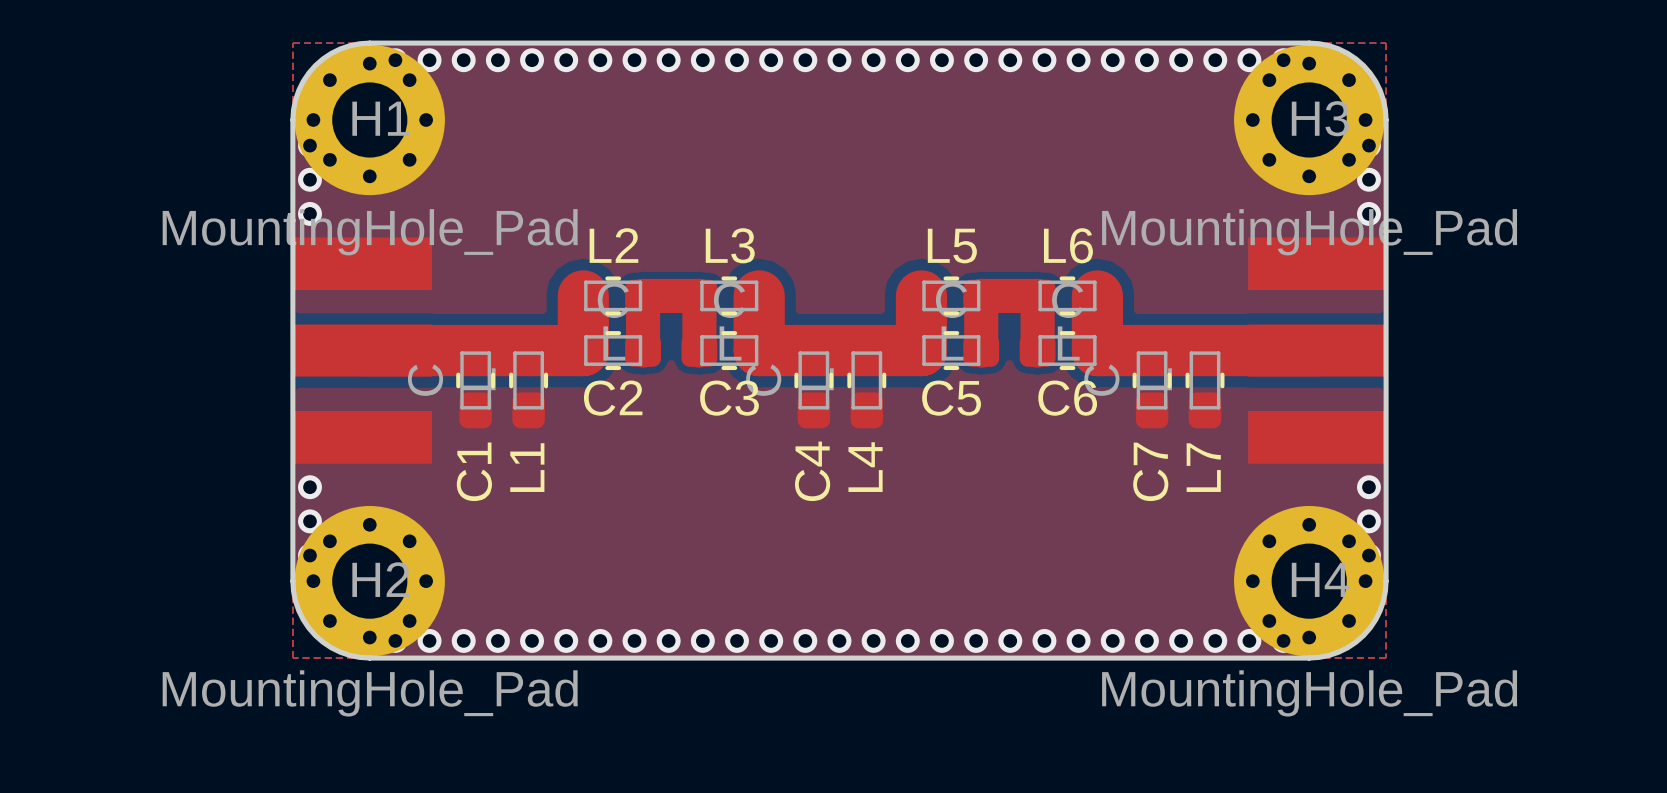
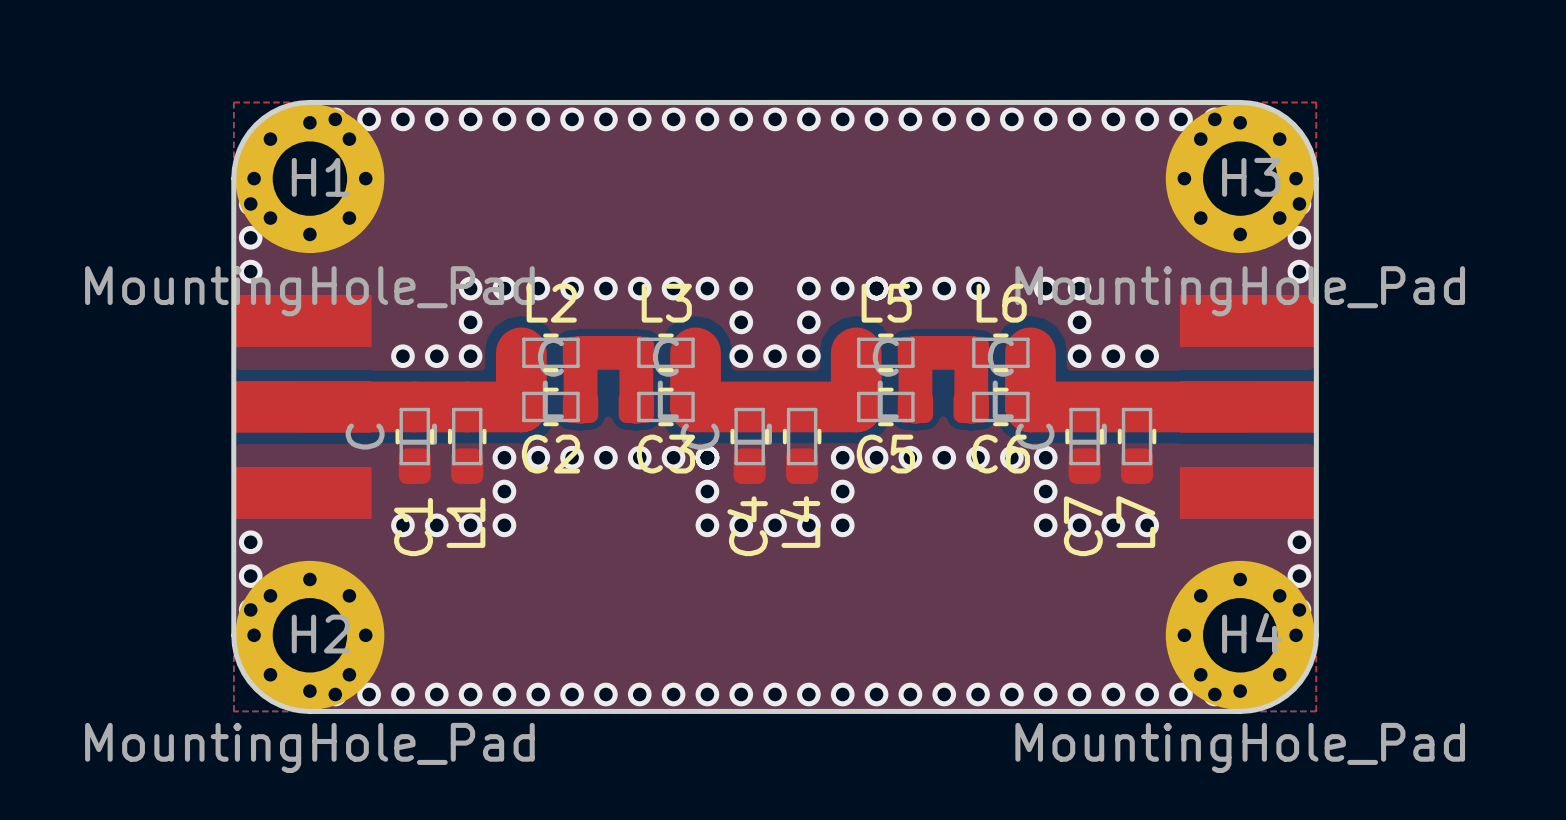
via: none -> (470, 288)
via: none -> (504, 288)
via: none -> (538, 288)
via: none -> (572, 288)
via: none -> (605, 288)
via: none -> (639, 288)
via: none -> (673, 288)
via: none -> (707, 288)
via: none -> (741, 288)
via: none -> (808, 288)
via: none -> (842, 288)
via: none -> (876, 288)
via: none -> (910, 288)
via: none -> (944, 288)
via: none -> (978, 288)
via: none -> (1045, 288)
via: none -> (1079, 288)
via: none -> (470, 322)
via: none -> (741, 322)
via: none -> (808, 322)
via: none -> (1079, 322)
via: none -> (402, 356)
via: none -> (436, 356)
via: none -> (470, 356)
via: none -> (741, 356)
via: none -> (775, 356)
via: none -> (808, 356)
via: none -> (1079, 356)
via: none -> (1113, 356)
via: none -> (1147, 356)
via: none -> (504, 457)
via: none -> (538, 457)
via: none -> (572, 457)
via: none -> (605, 457)
via: none -> (639, 457)
via: none -> (673, 457)
via: none -> (707, 457)
via: none -> (842, 457)
via: none -> (876, 457)
via: none -> (910, 457)
via: none -> (944, 457)
via: none -> (978, 457)
via: none -> (1011, 457)
via: none -> (1045, 457)
via: none -> (504, 491)
via: none -> (707, 491)
via: none -> (842, 491)
via: none -> (1045, 491)
via: none -> (402, 525)
via: none -> (436, 525)
via: none -> (470, 525)
via: none -> (504, 525)
via: none -> (707, 525)
via: none -> (741, 525)
via: none -> (775, 525)
via: none -> (808, 525)
via: none -> (842, 525)
via: none -> (1045, 525)
via: none -> (1079, 525)
via: none -> (1113, 525)
via: none -> (1147, 525)

